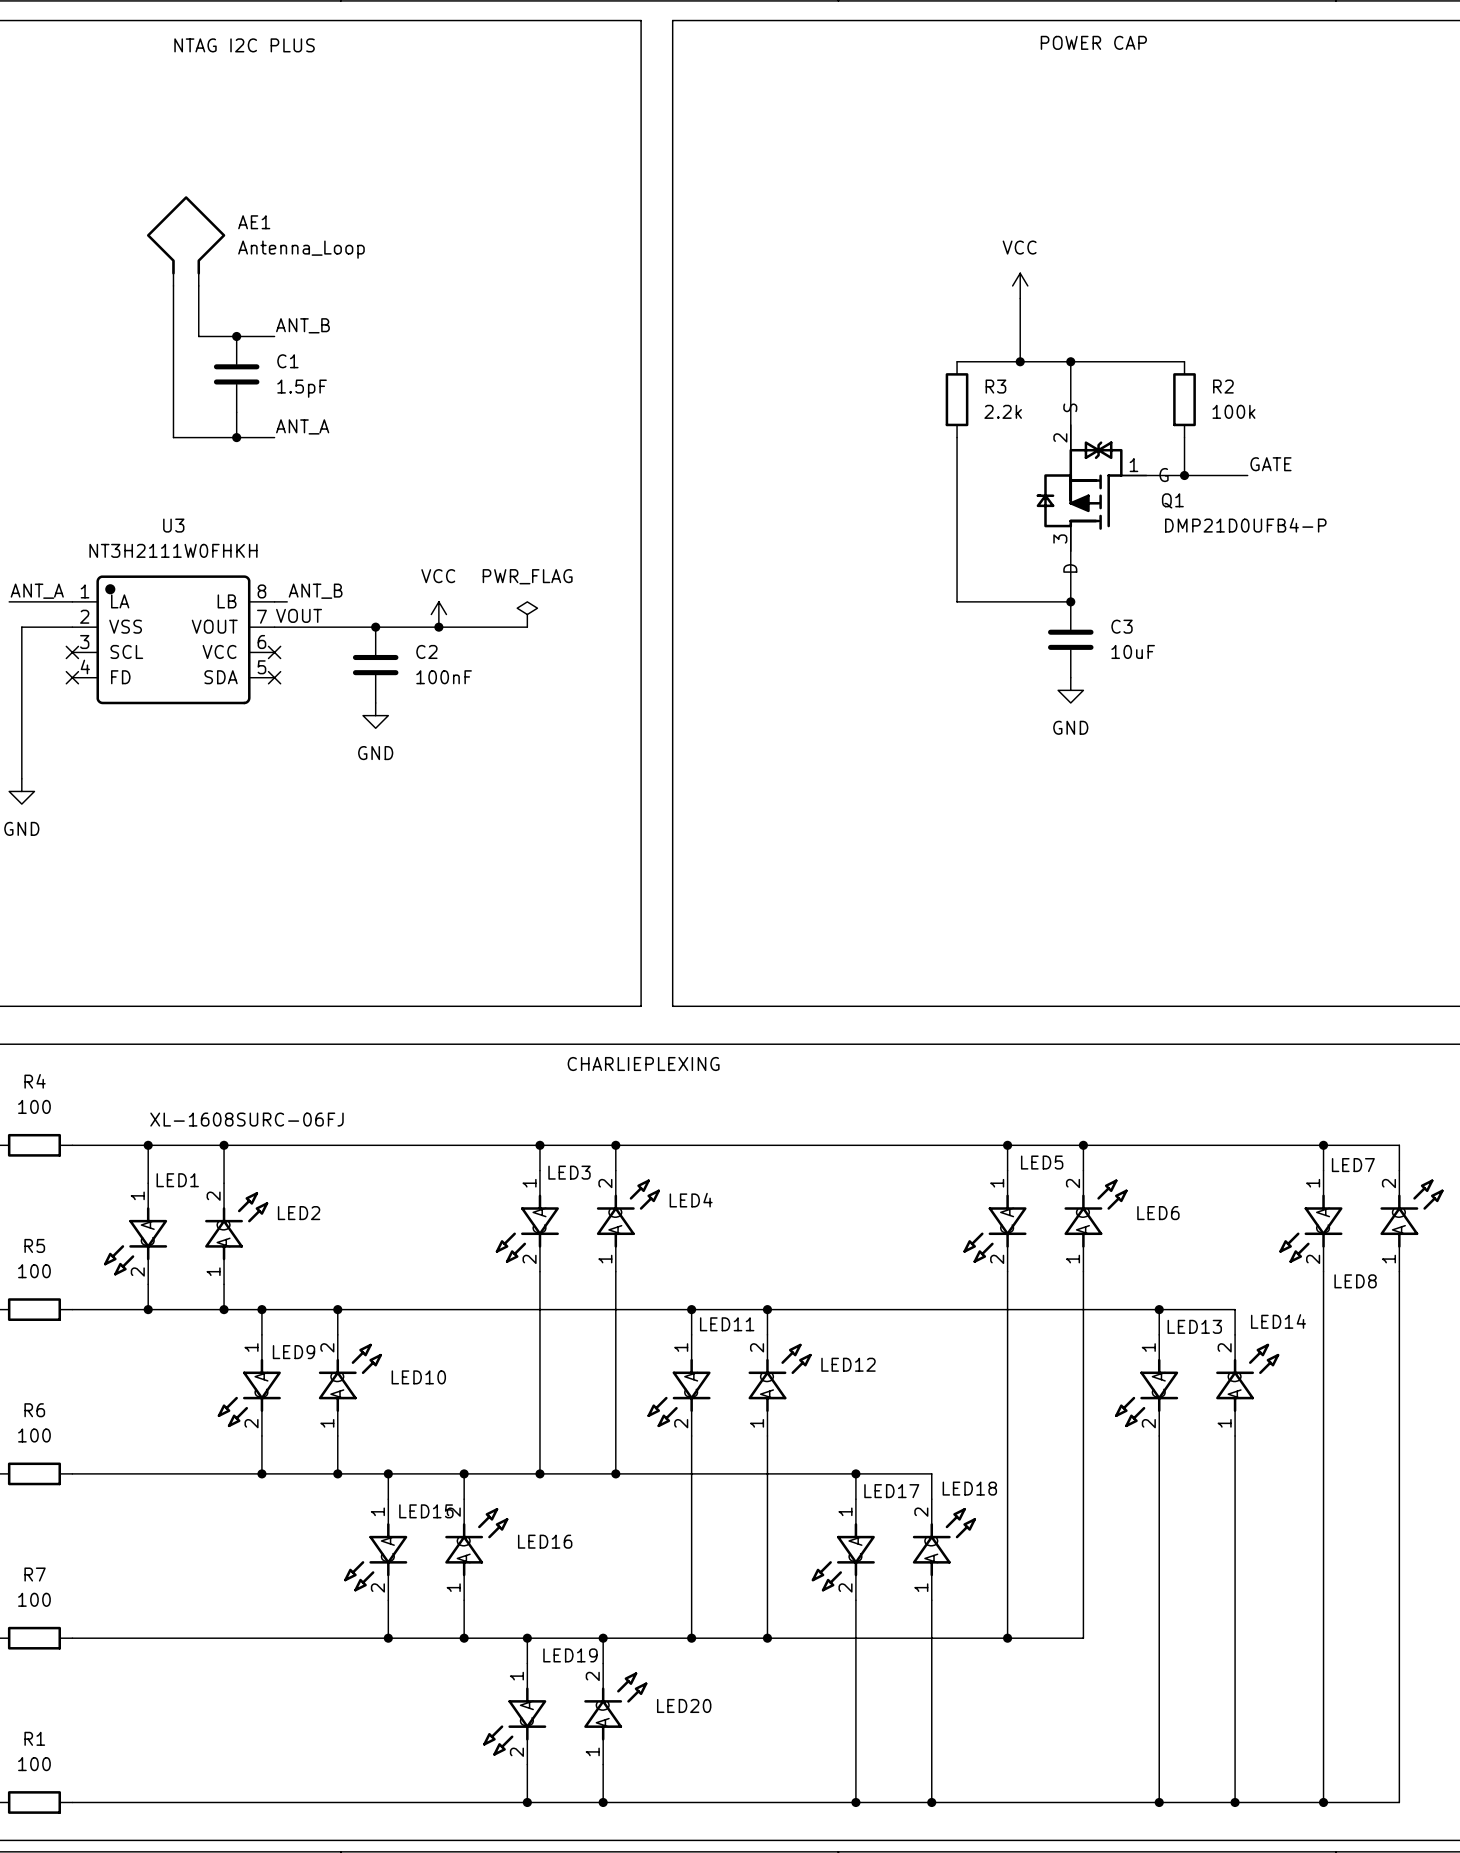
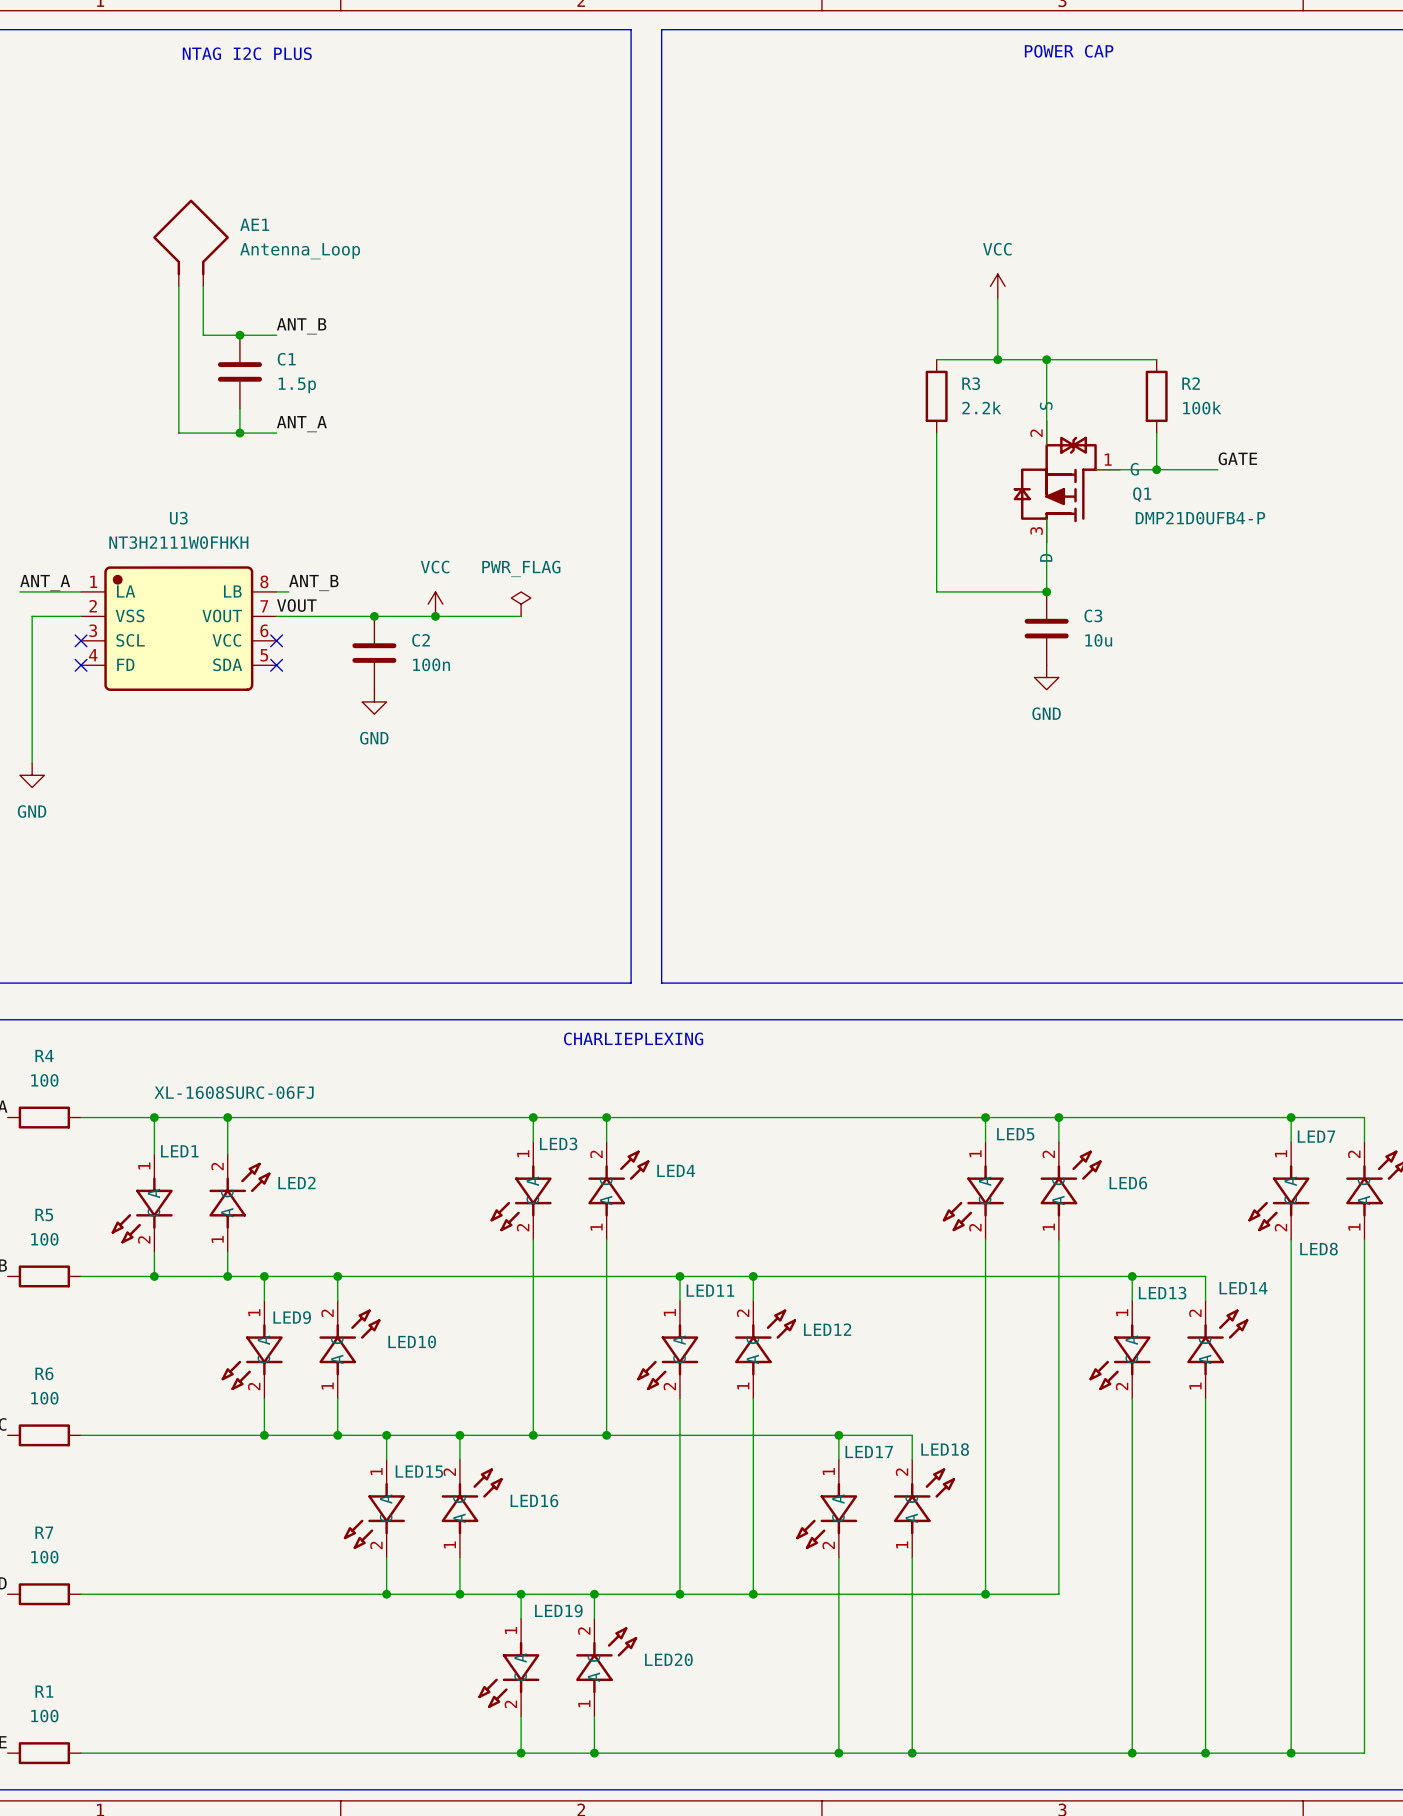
C1 value: 1.5pF (302, 388) -> 1.5p (297, 385)
C3 value: 10uF (1133, 651) -> 10u (1098, 640)
C2 value: 100nF (444, 677) -> 100n (431, 664)

